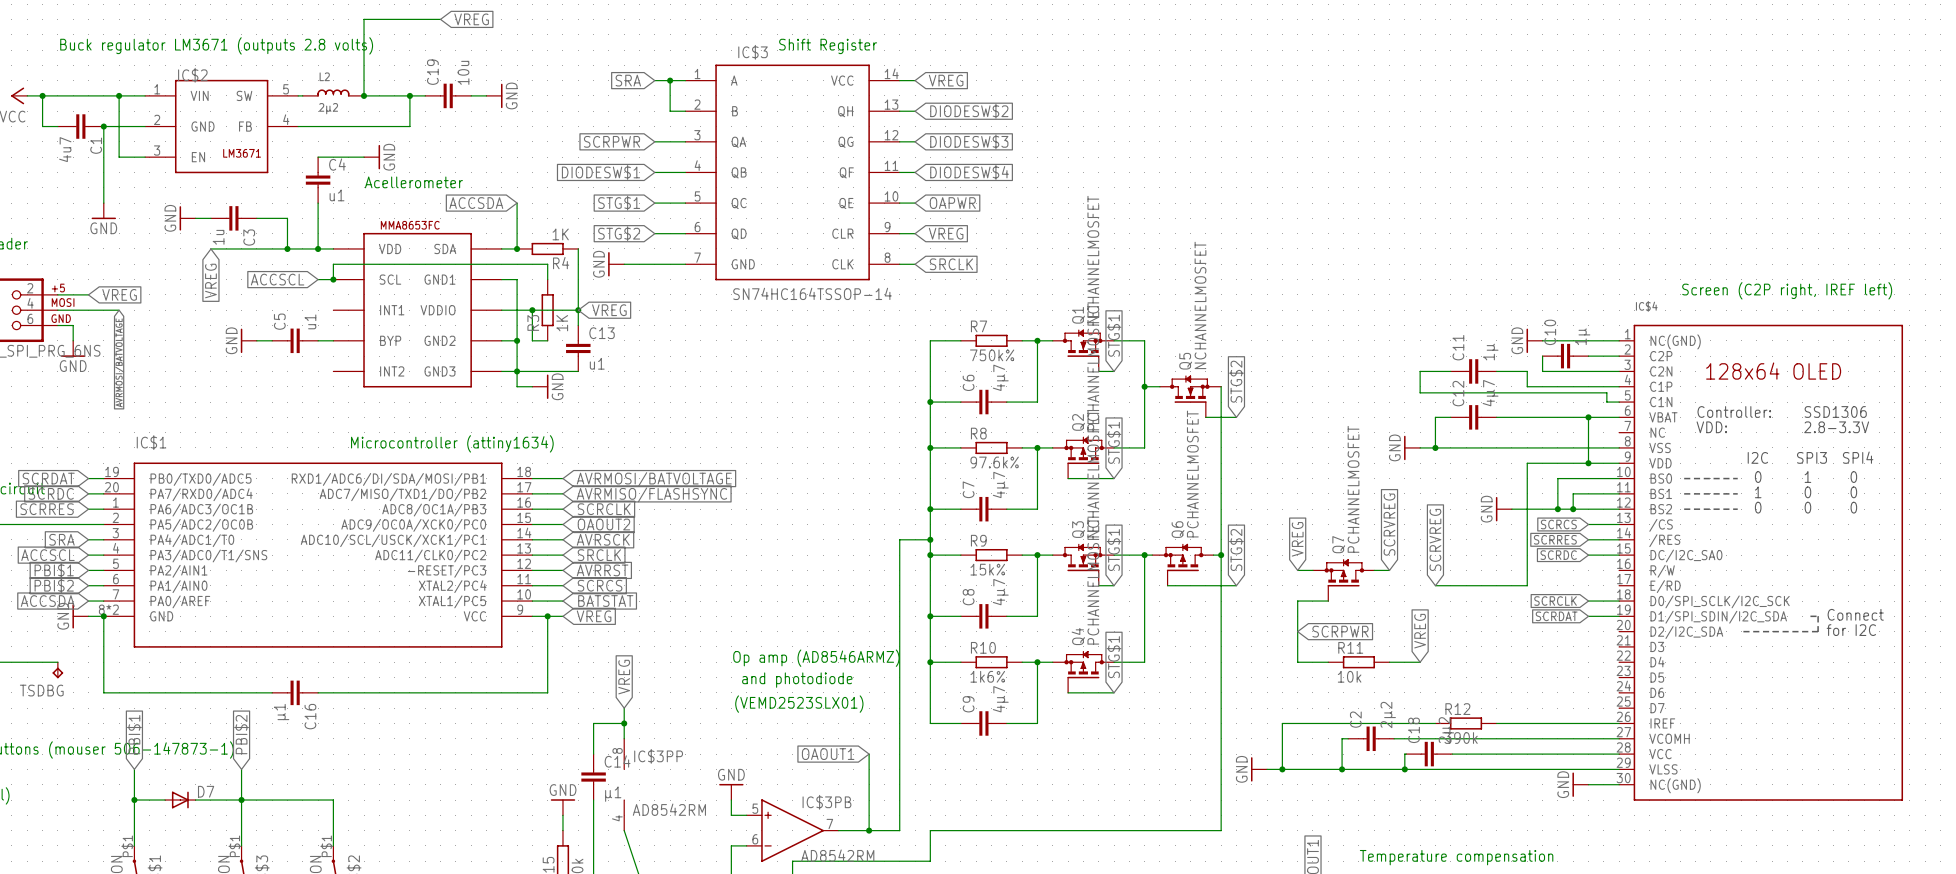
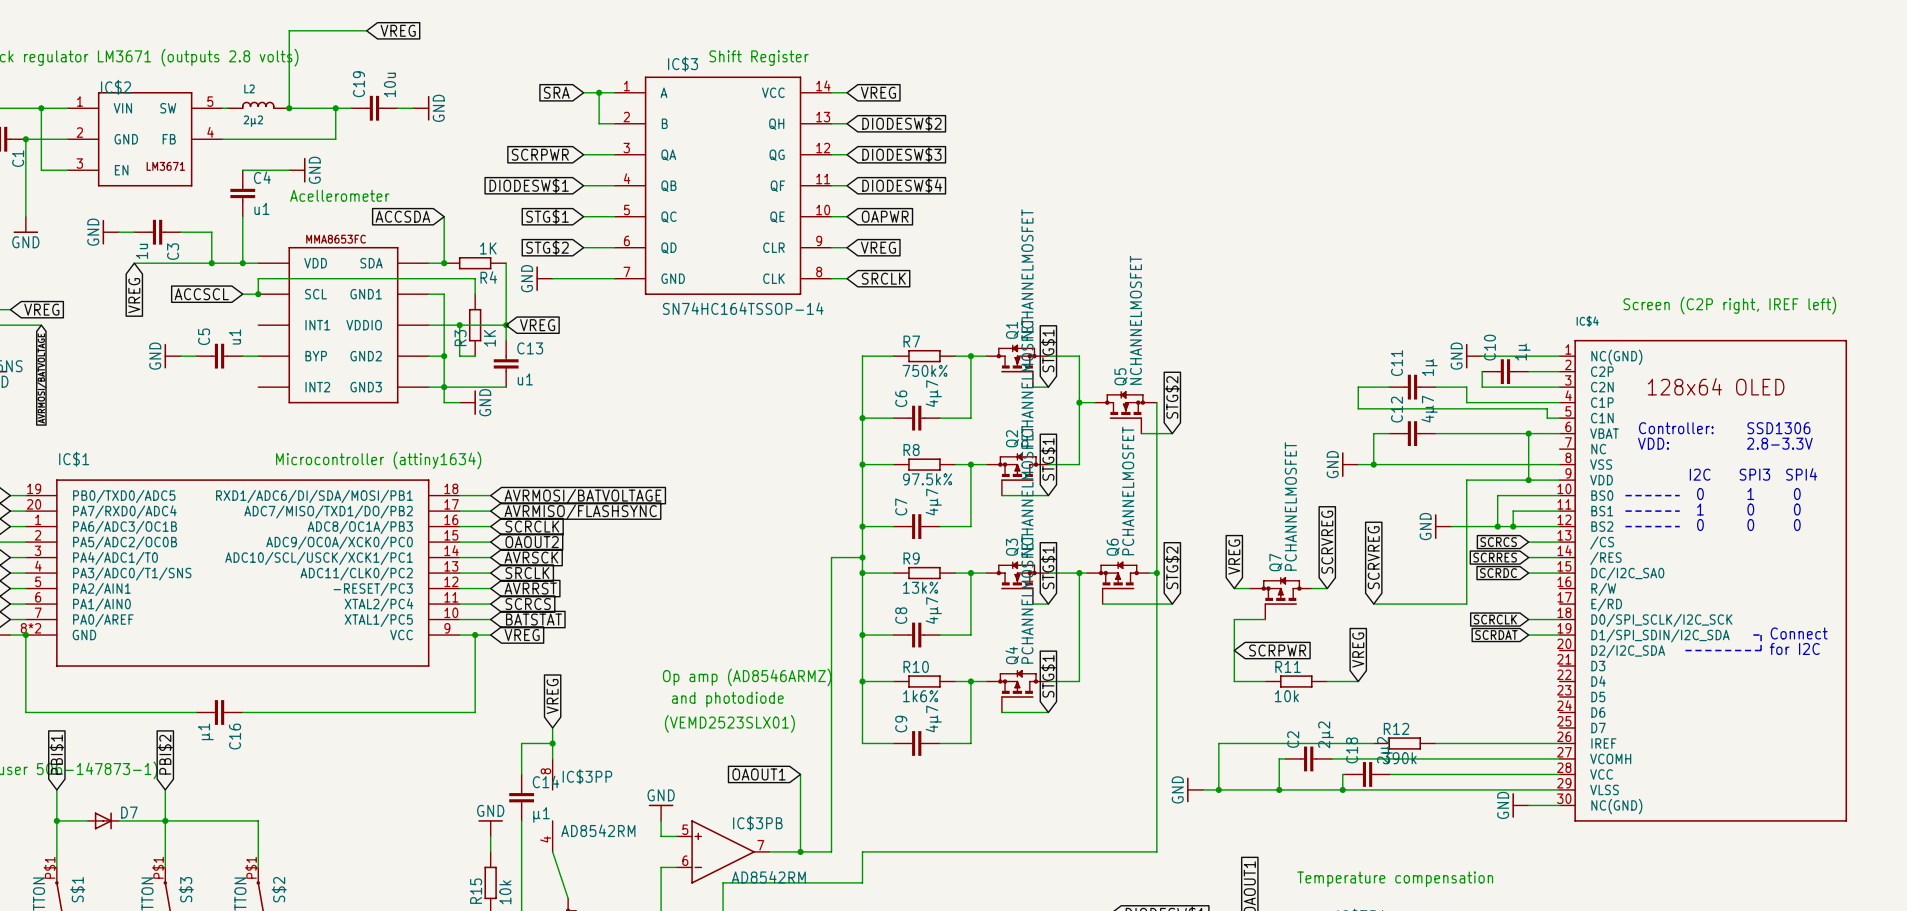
R8 value: 97.6k% (994, 462) -> 97.5k% (927, 479)
R9 value: 15k% (987, 569) -> 13k% (920, 587)

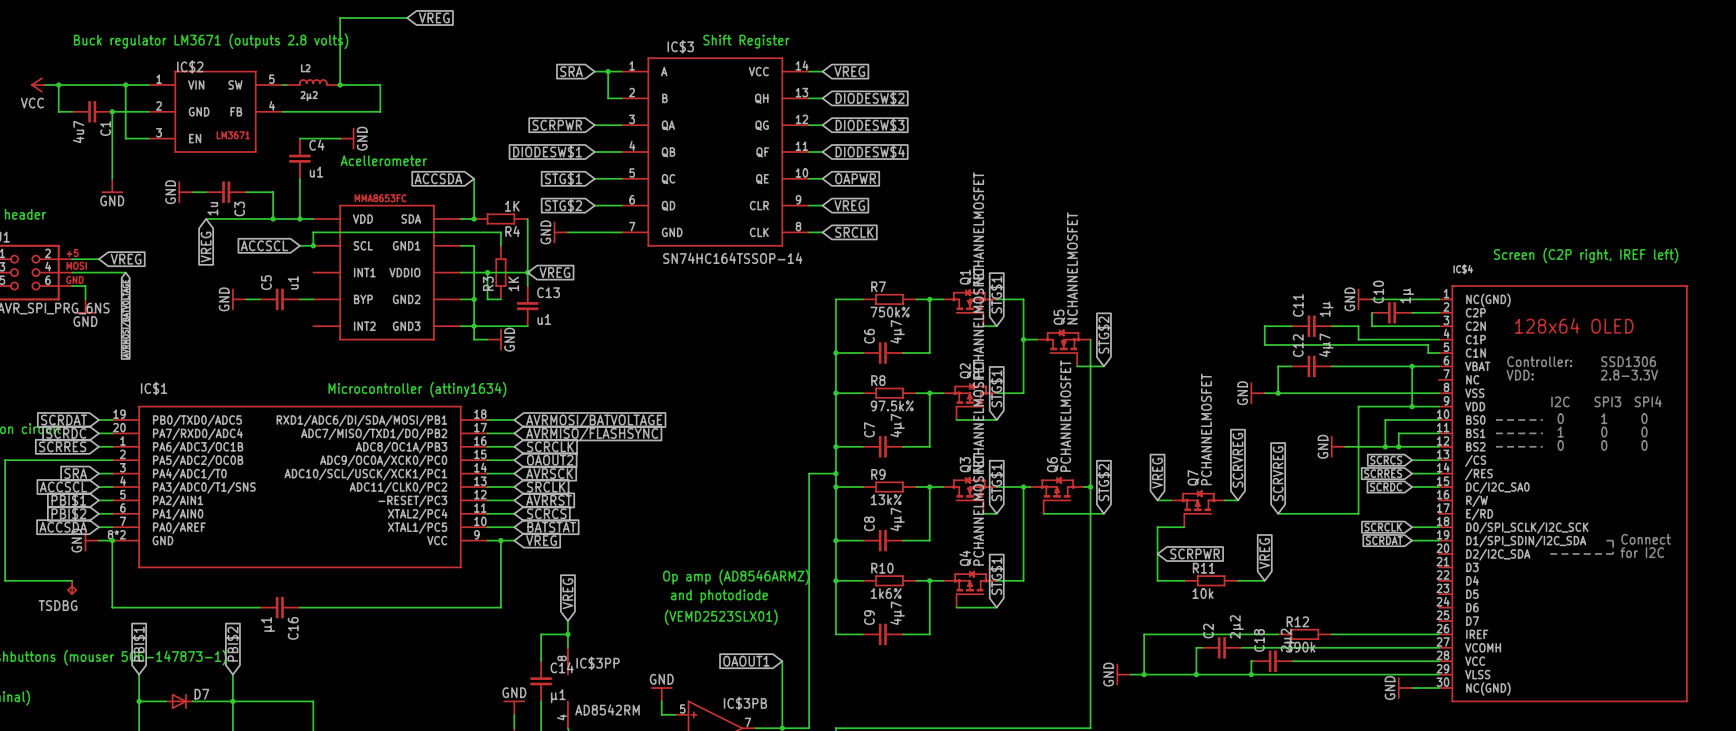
wire: (335, 108) (351, 108) -> none
junction: (335, 108) -> none
C19: 10u (374, 108) -> none
wire: (397, 108) (413, 108) -> none
power symbol: GND (421, 108) -> none

